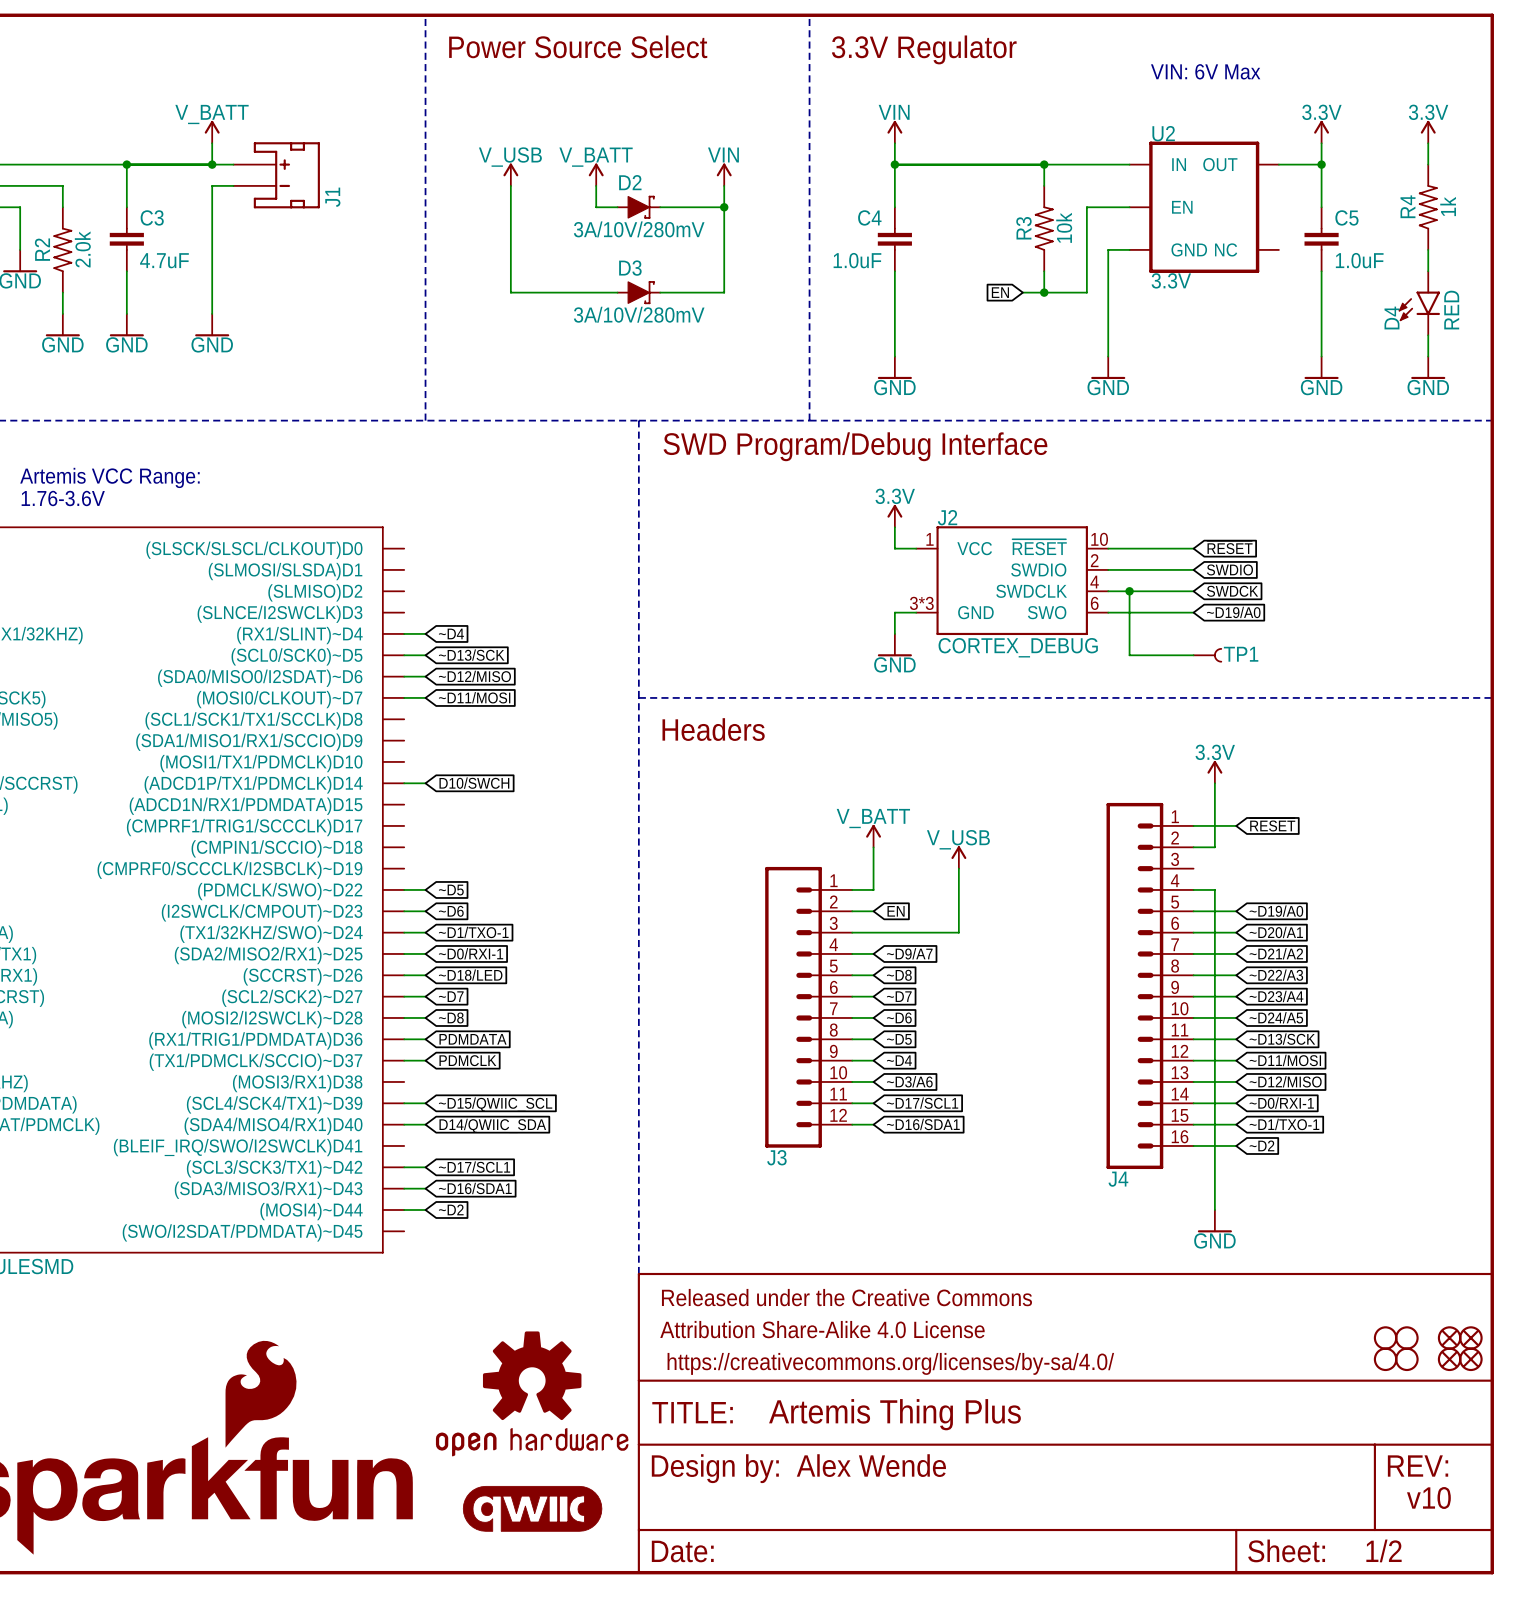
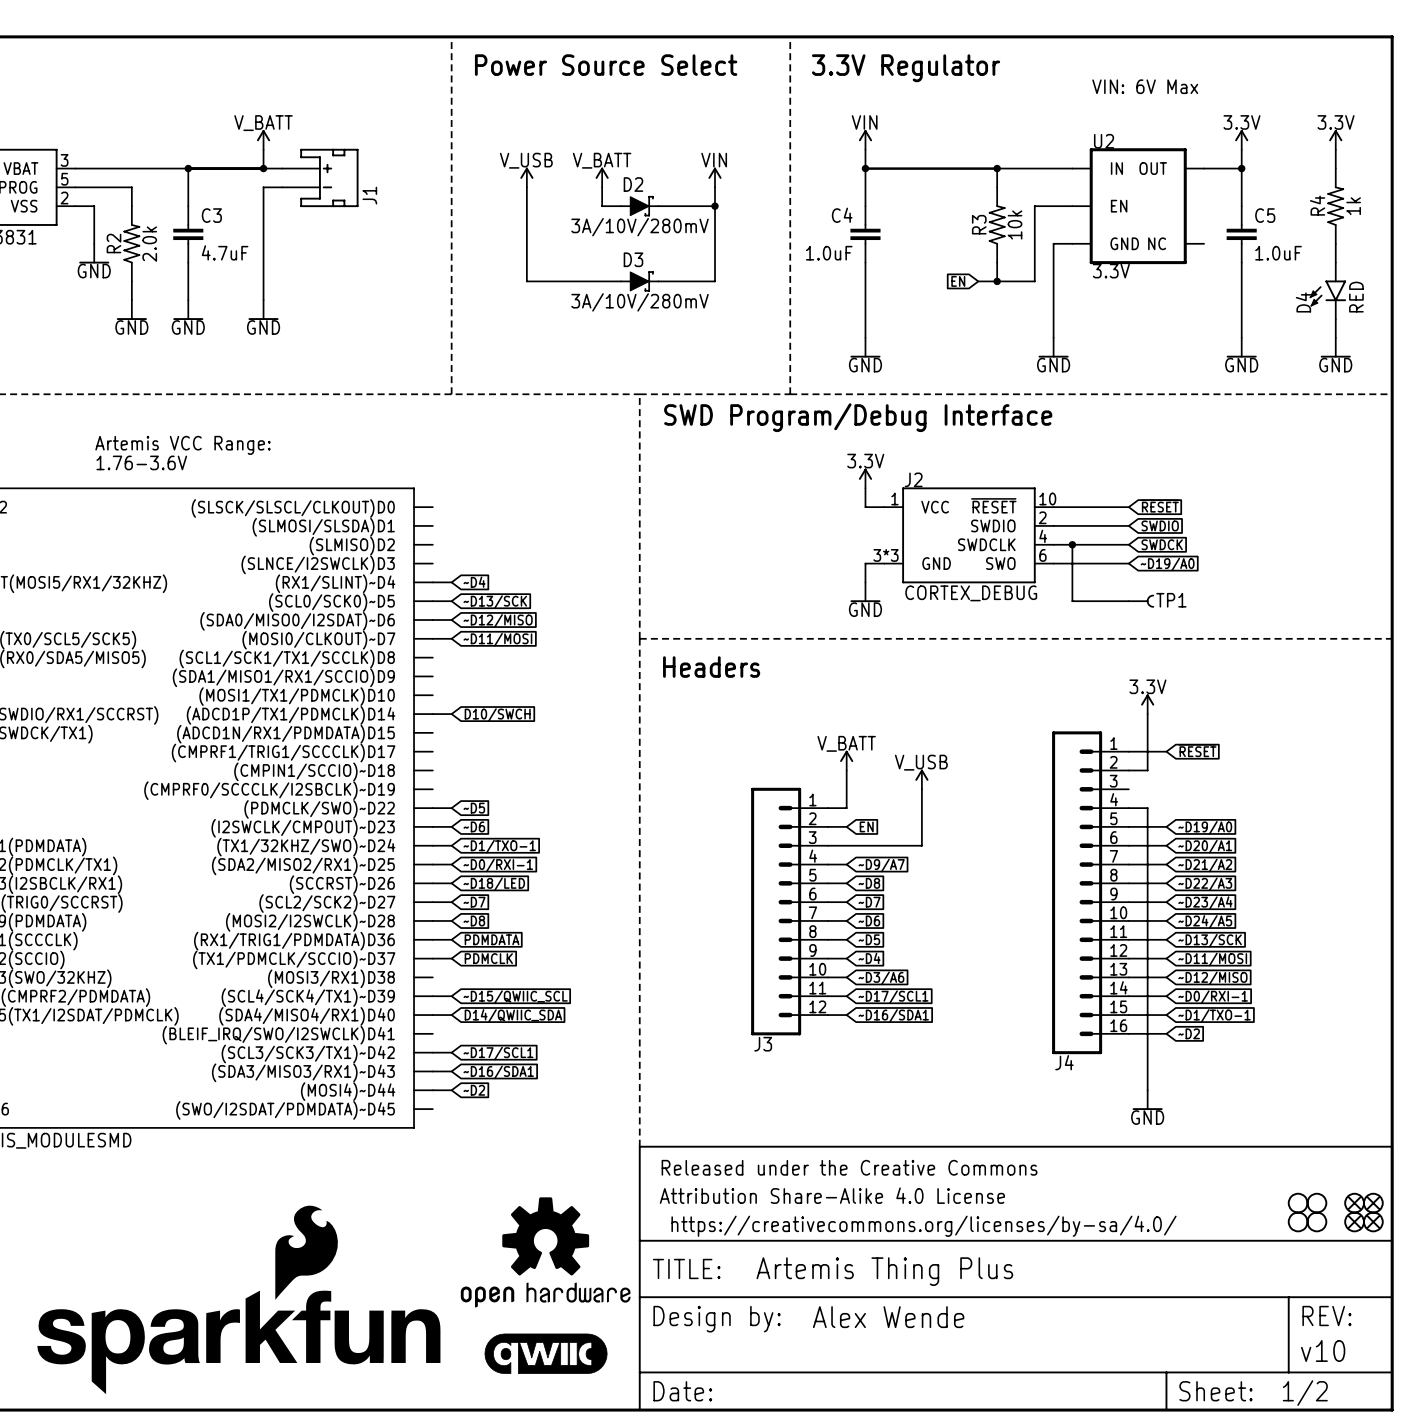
text: Alex Wende (871, 1465) -> none
part text: none -> Alex Wende (888, 1317)
text: v10 (1428, 1498) -> none
part text: none -> v10 (1323, 1350)

